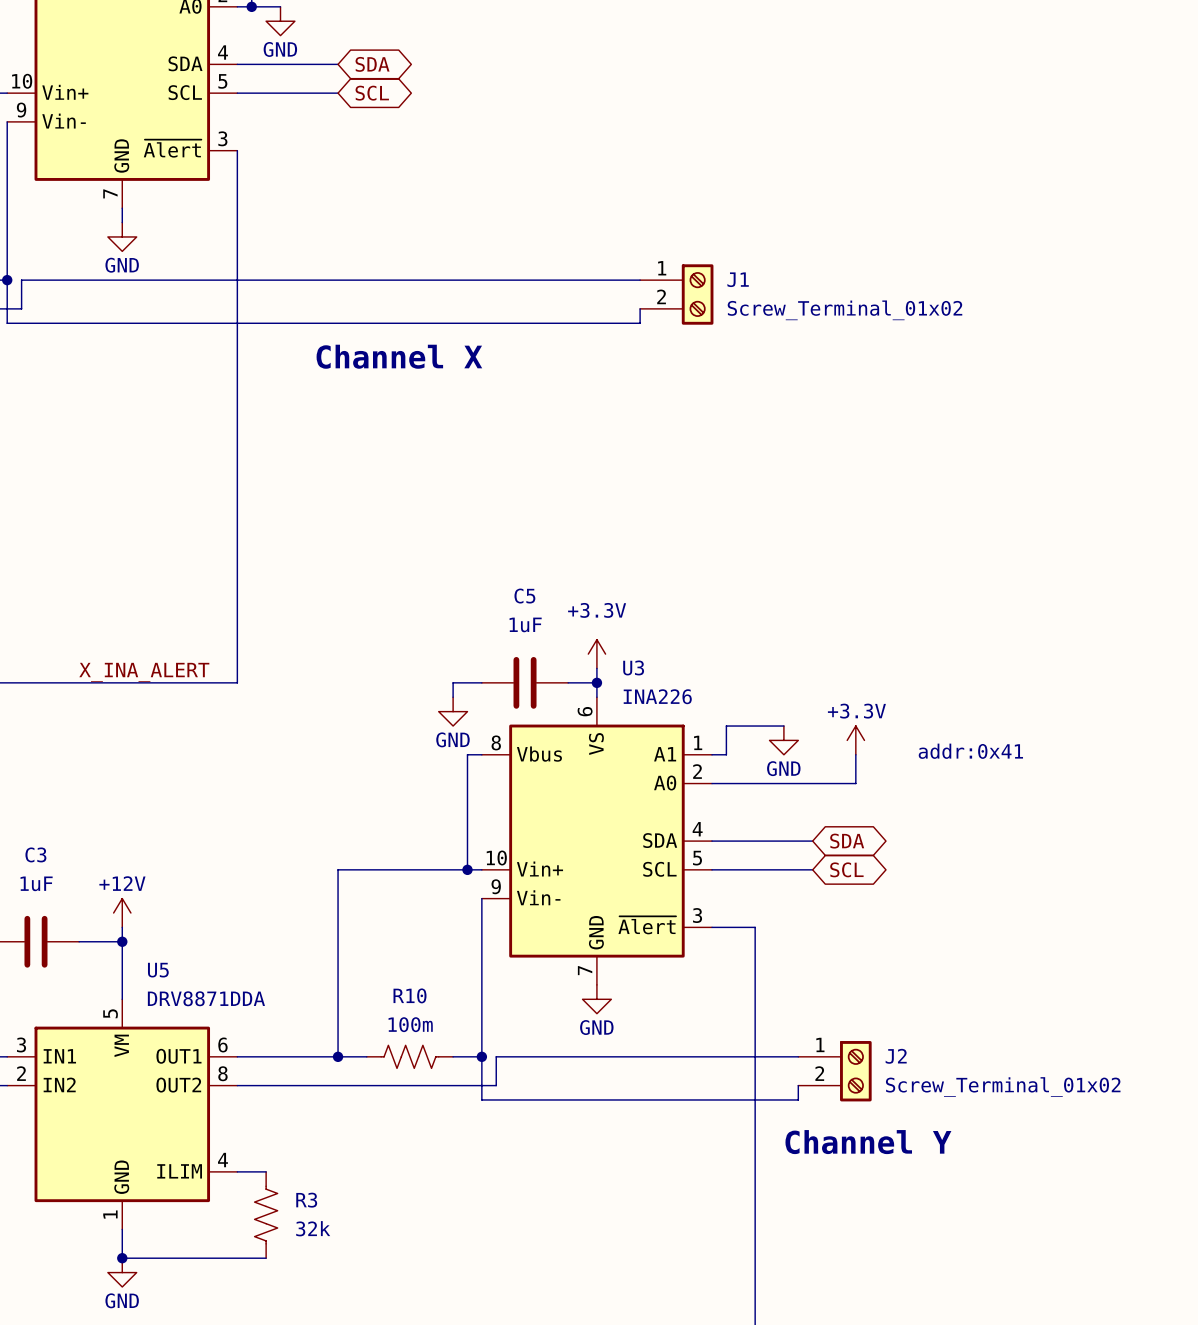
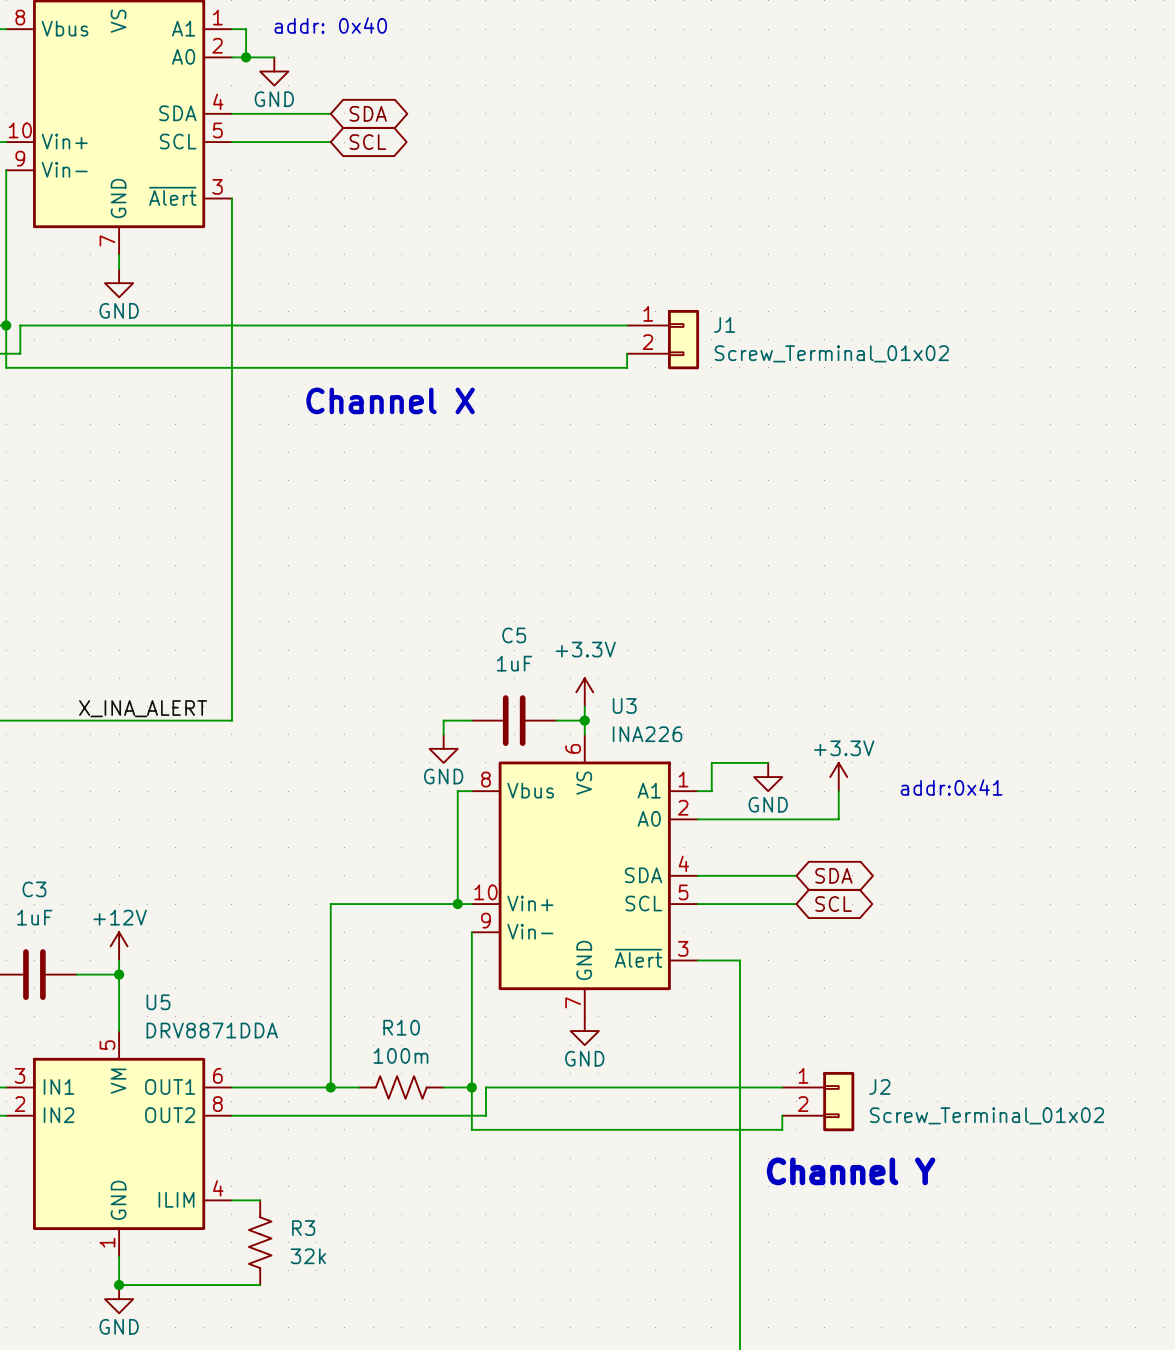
J1 symbol: [640, 264, 714, 325] -> [627, 309, 700, 370]
J2 symbol: [798, 1041, 872, 1102] -> [782, 1071, 855, 1132]

